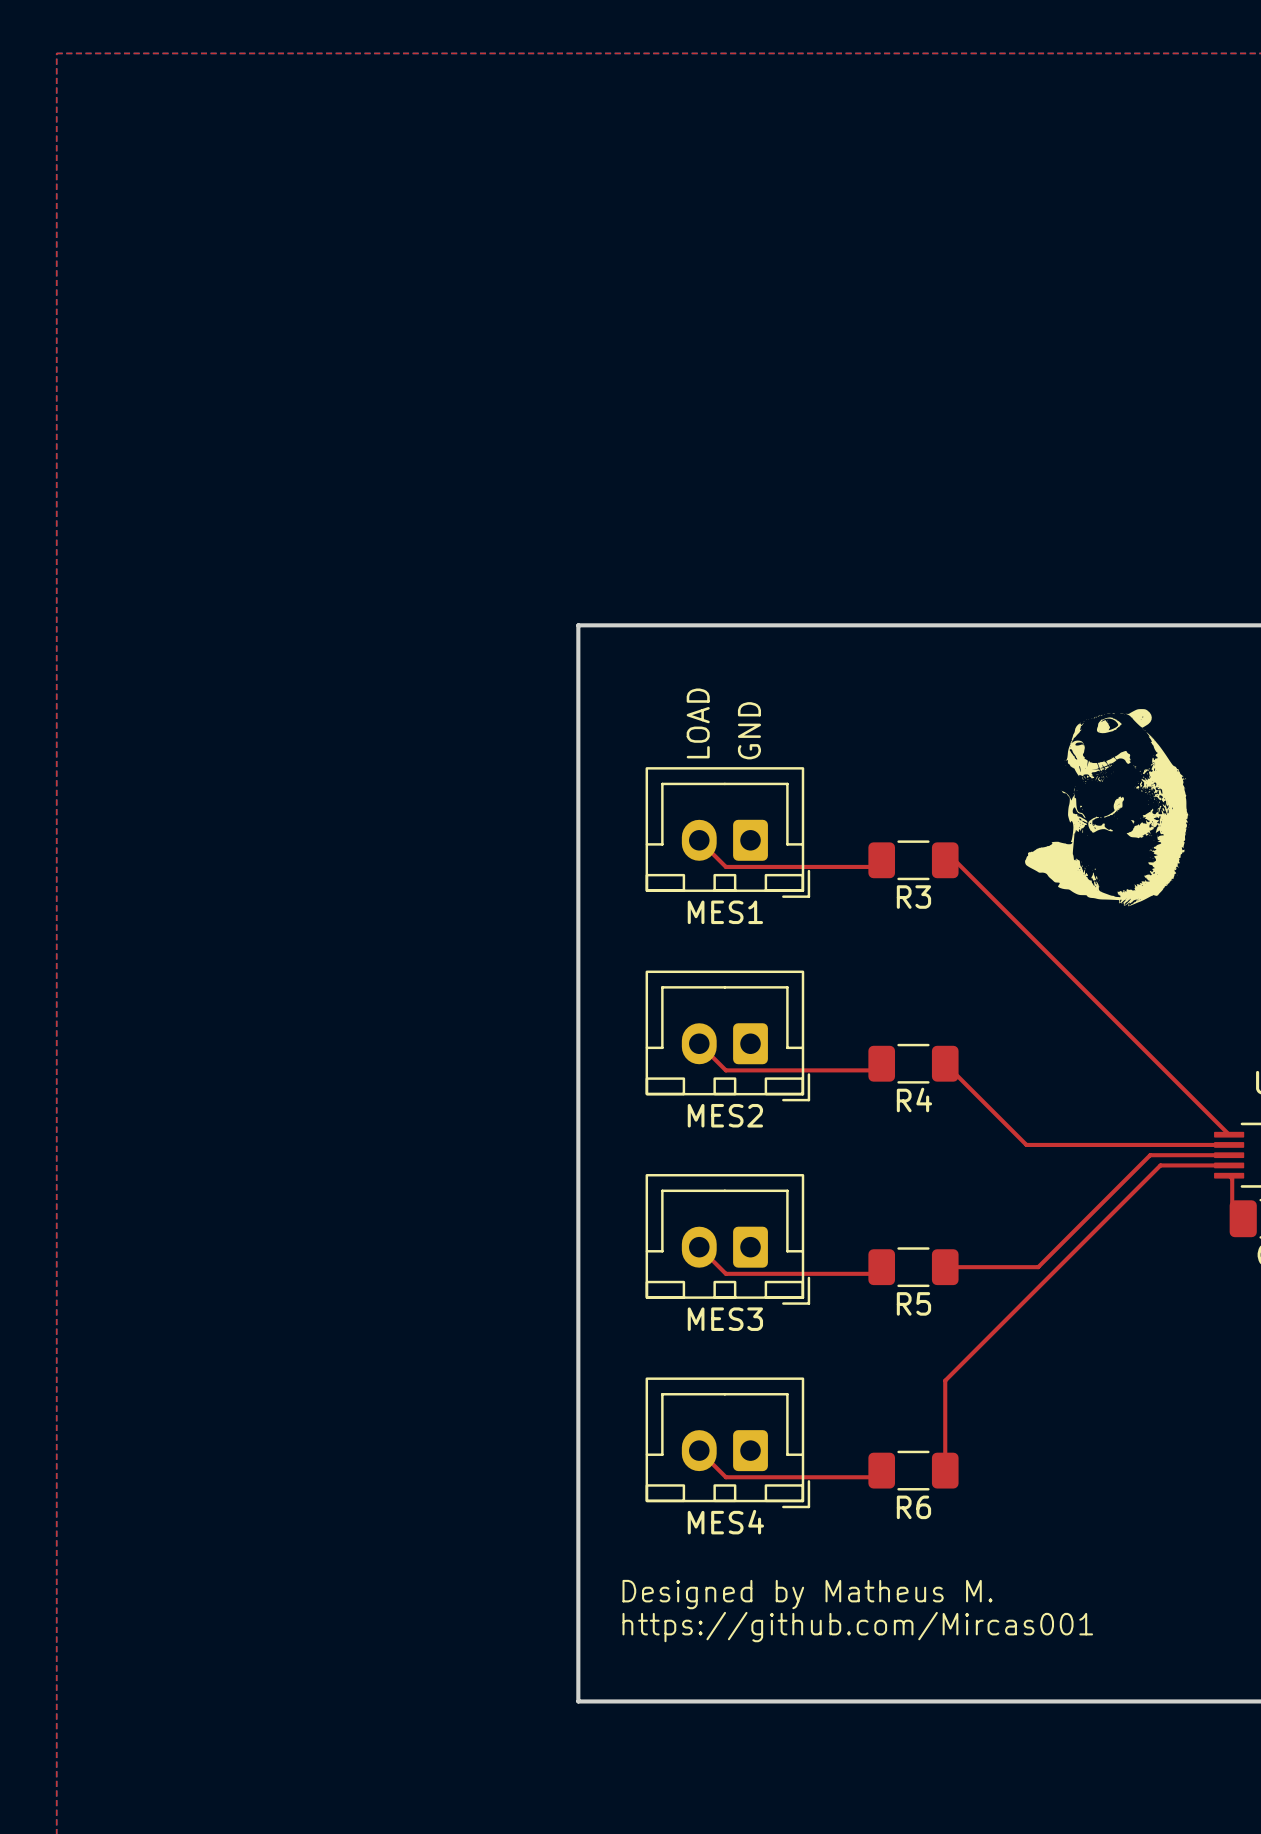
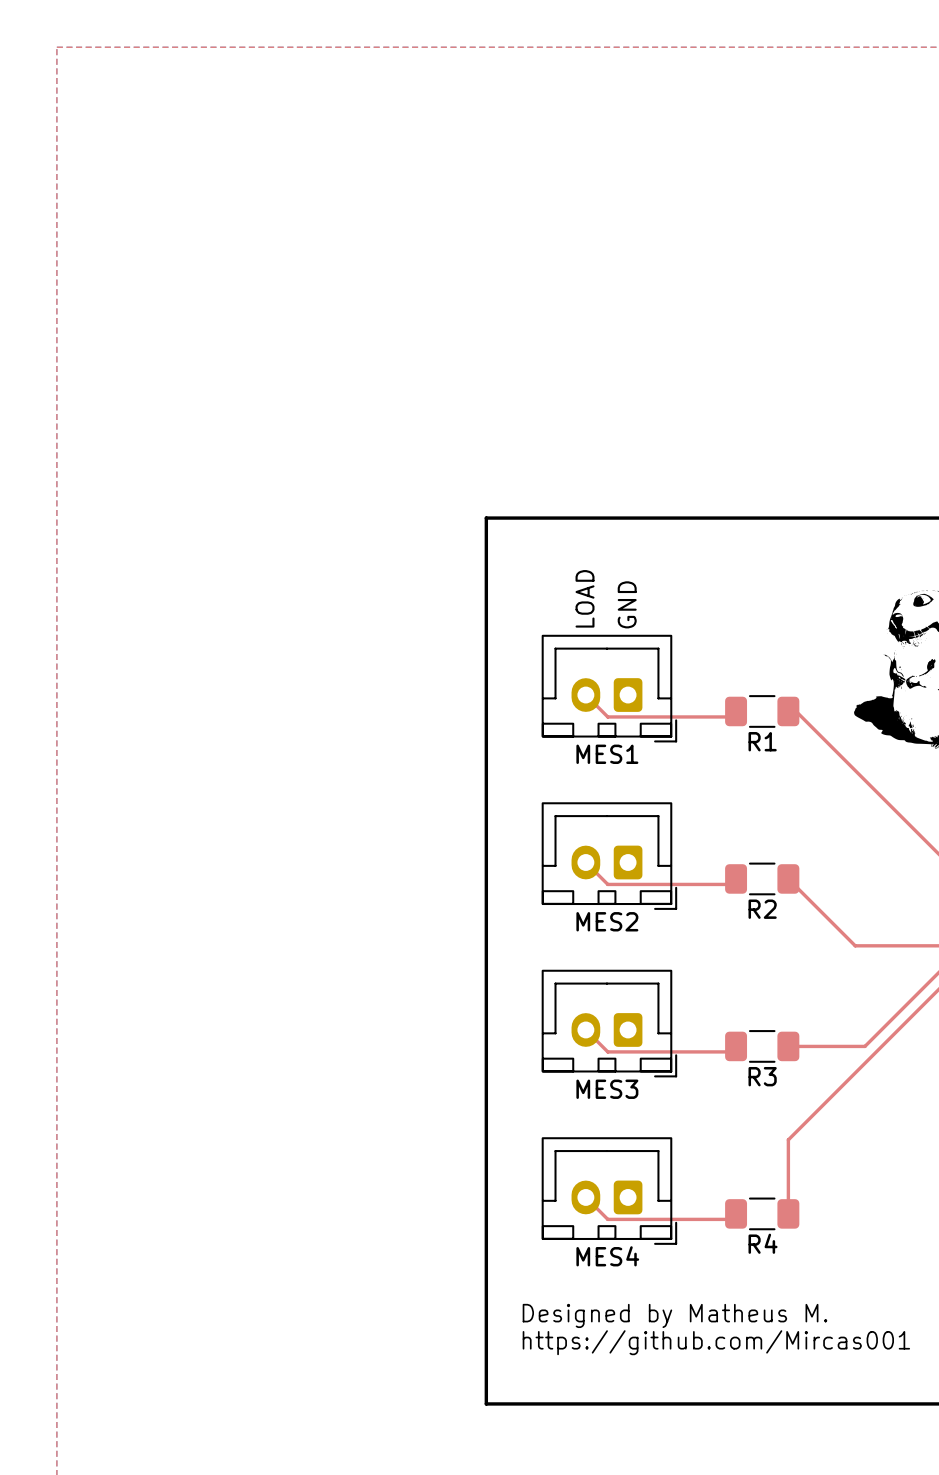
R3 name: R3 (913, 897) -> R1 (762, 741)
R4 name: R4 (914, 1099) -> R2 (762, 909)
R5 name: R5 (913, 1303) -> R3 (762, 1076)
R6 name: R6 (913, 1507) -> R4 (763, 1243)

